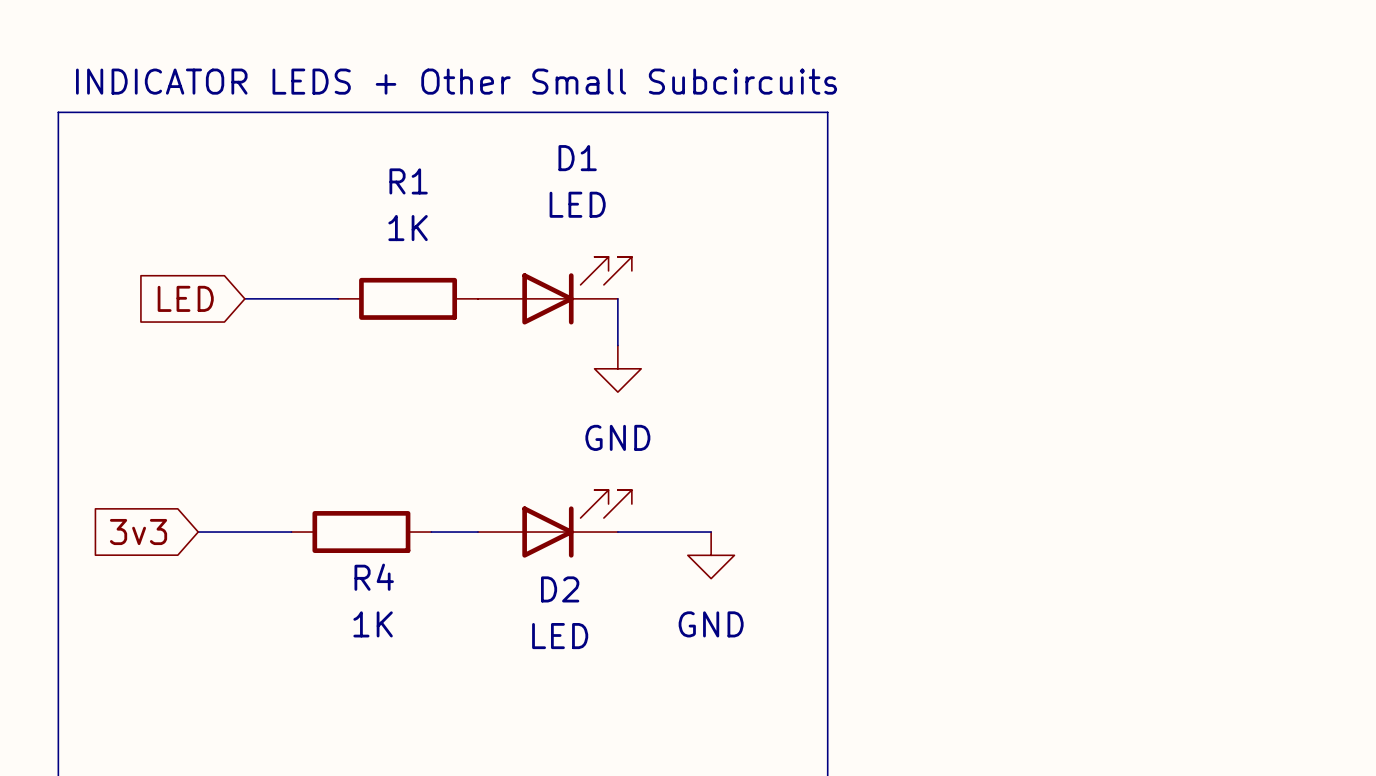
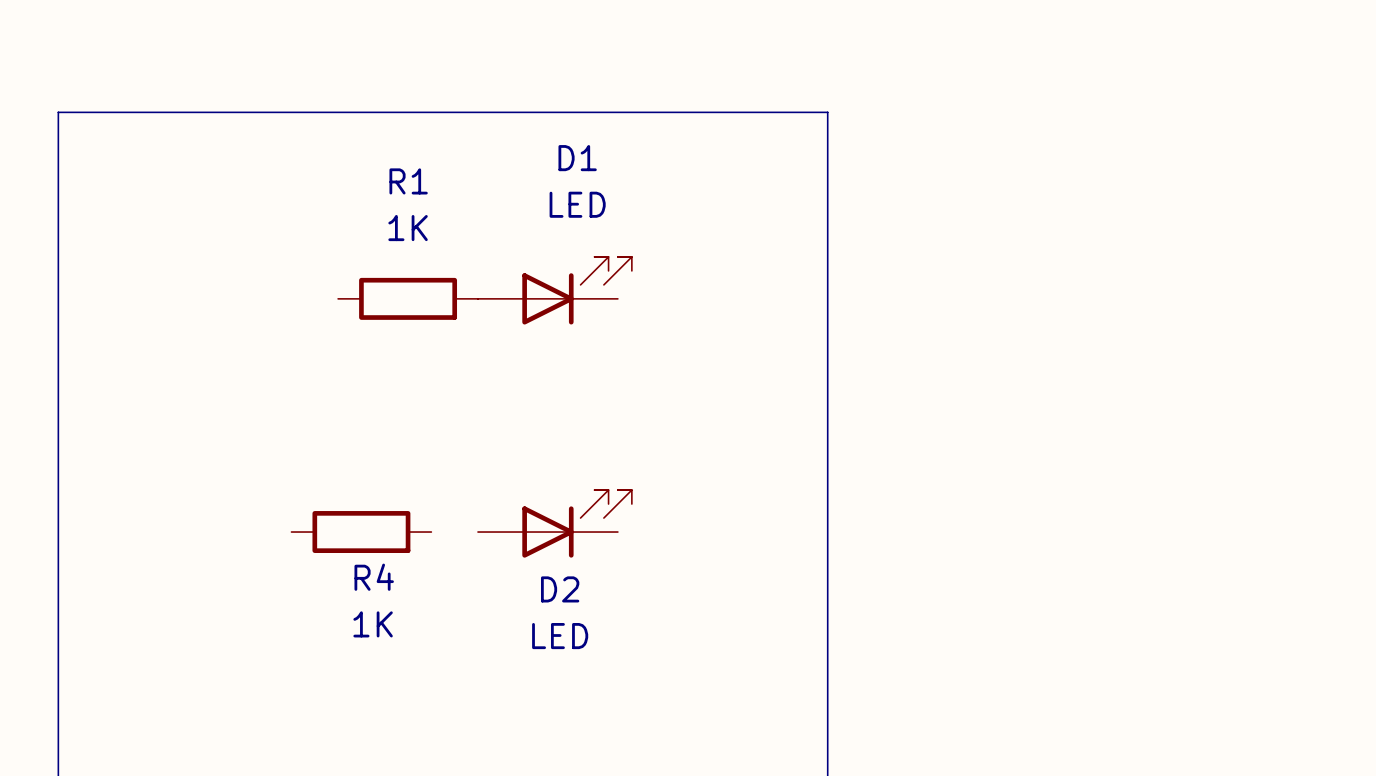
text: INDICATOR LEDS + Other Small Subcircuits (456, 81) -> none
global label: LED (185, 298) -> none
wire: (244, 298) (338, 298) -> none
wire: (617, 298) (617, 345) -> none
power symbol: GND (617, 368) -> none
global label: 3v3 (138, 532) -> none
wire: (198, 532) (291, 532) -> none
wire: (431, 532) (478, 532) -> none
wire: (617, 532) (711, 532) -> none
power symbol: GND (711, 555) -> none

